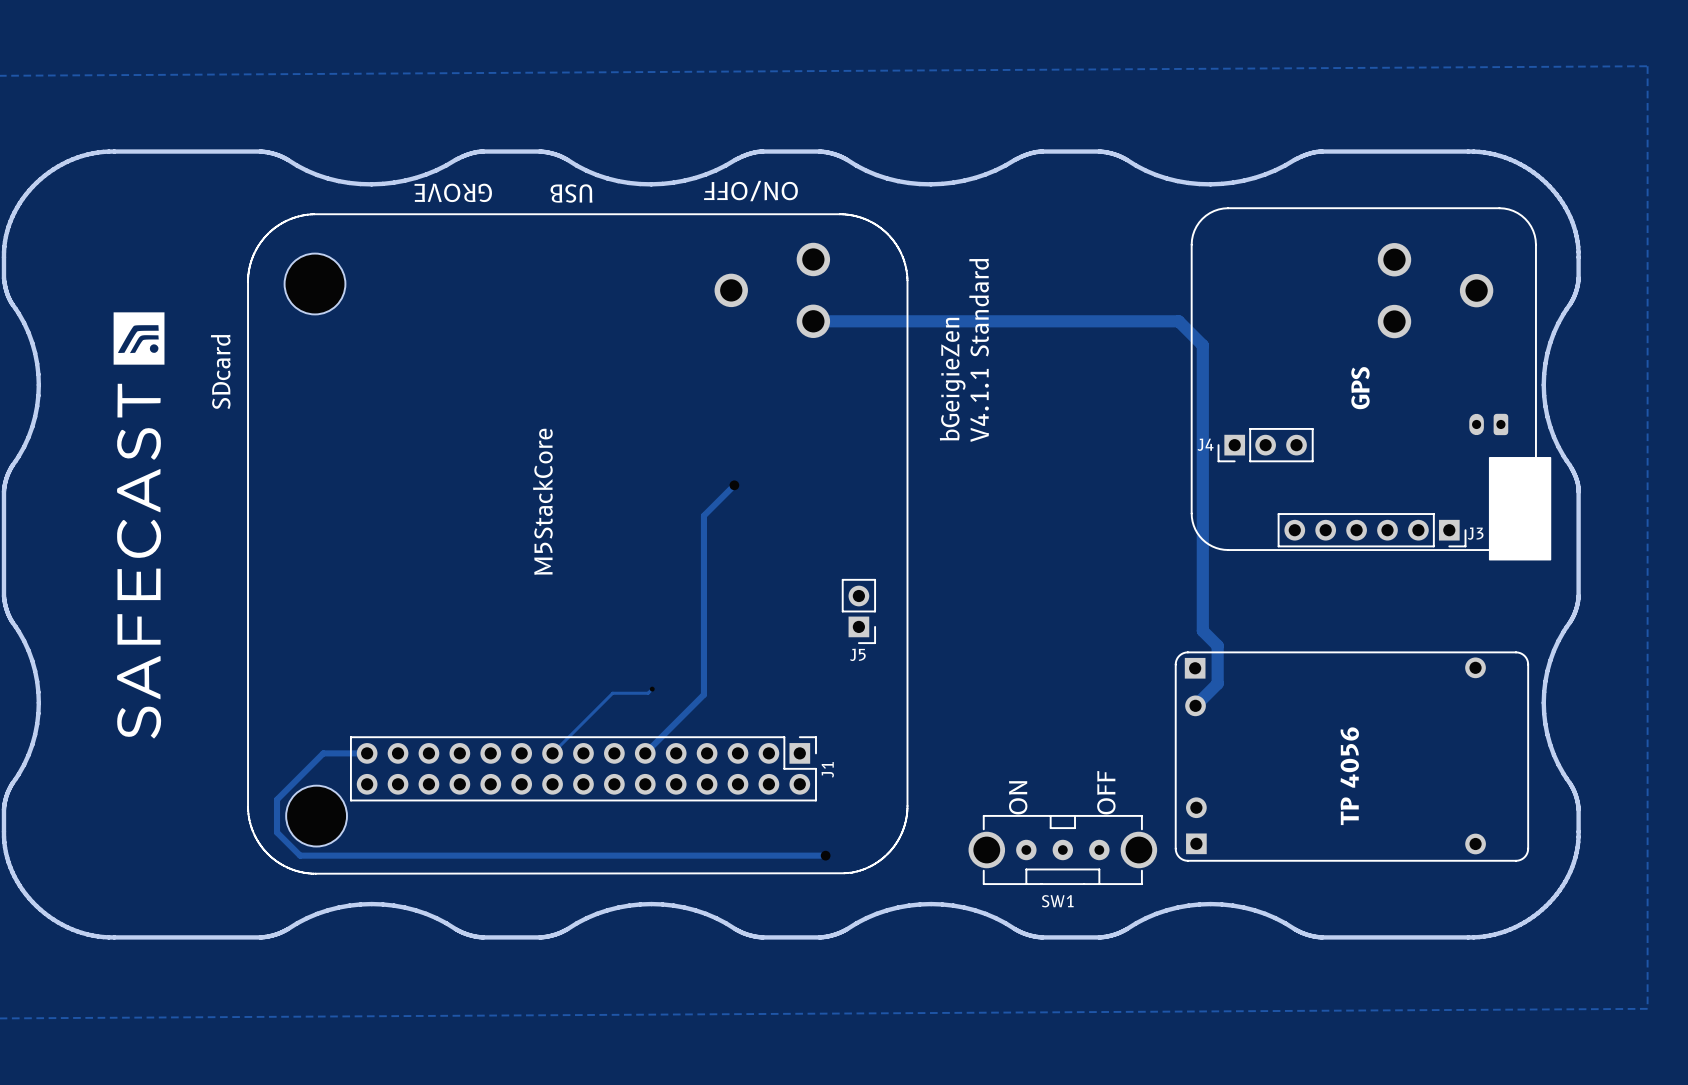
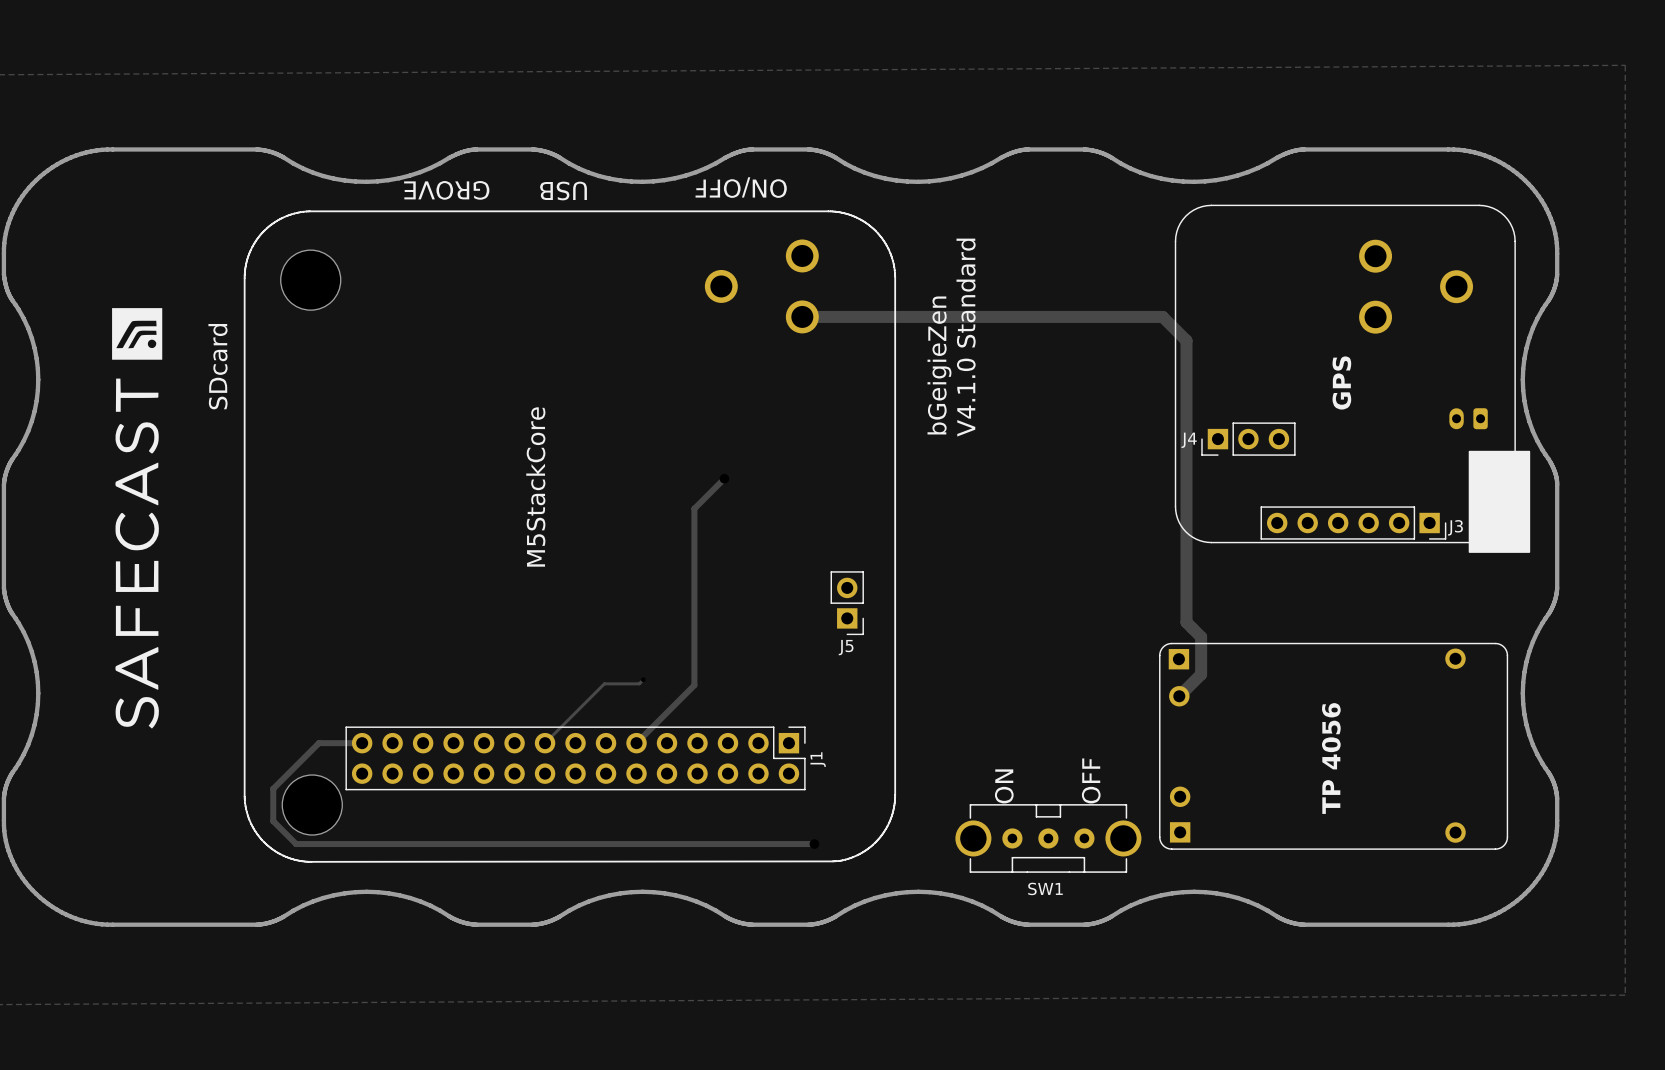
text: V4.1.1 Standard (979, 350) -> V4.1.0 Standard (966, 337)

